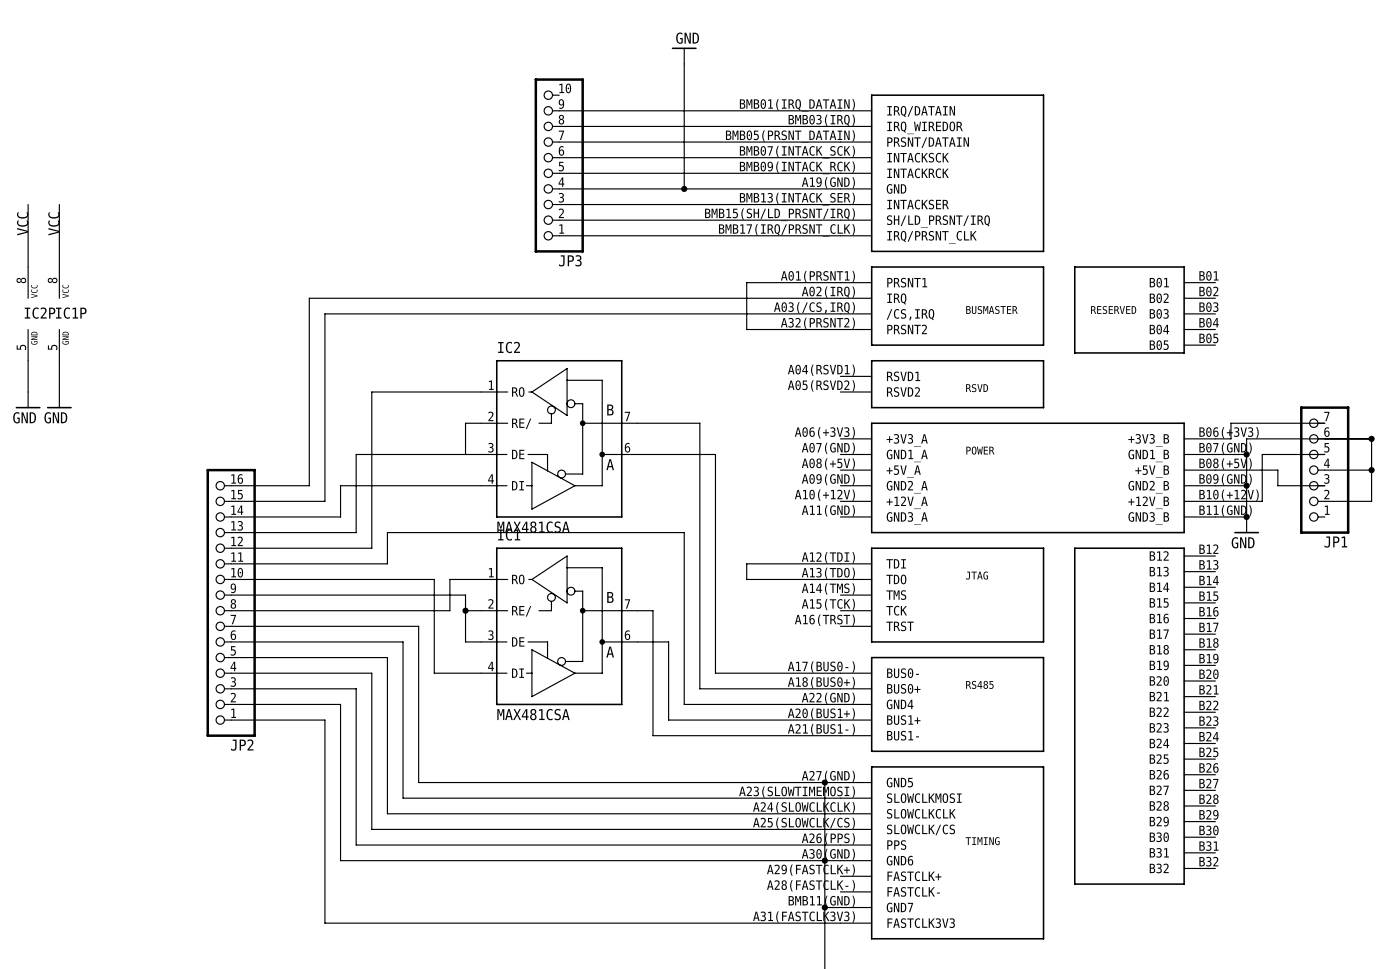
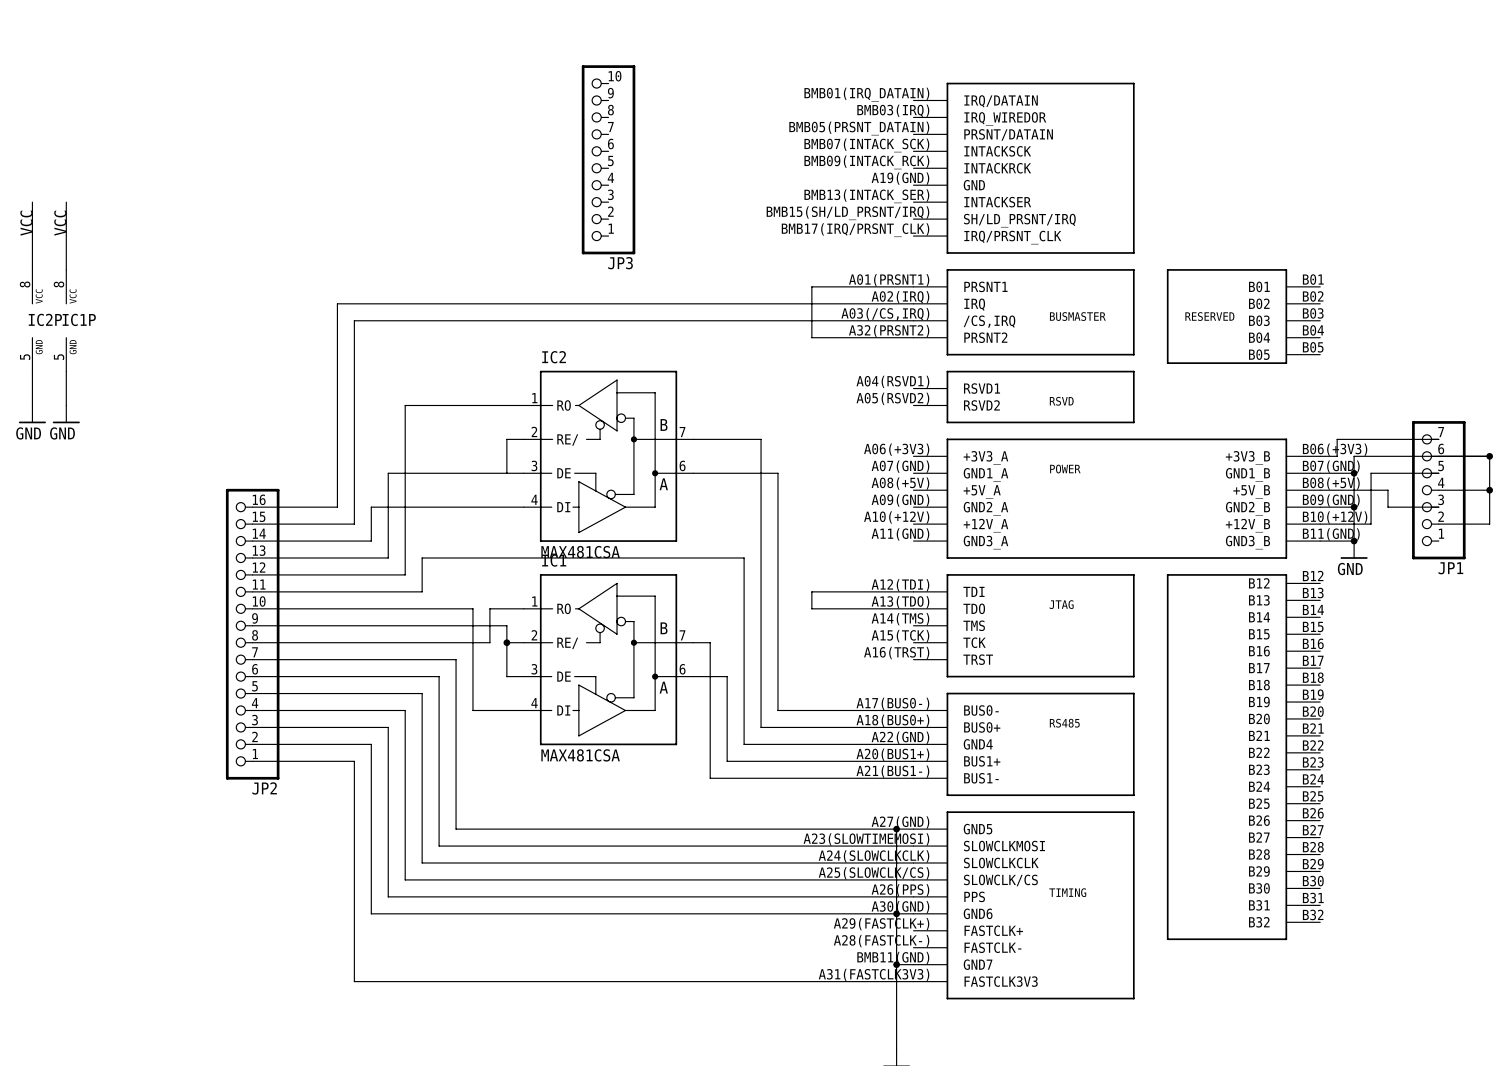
power symbol: GND (684, 55) -> none
wire: (684, 63) (684, 188) -> none
wire: (559, 110) (840, 110) -> none
wire: (559, 126) (840, 126) -> none
wire: (559, 142) (840, 142) -> none
wire: (559, 157) (840, 157) -> none
wire: (559, 173) (840, 173) -> none
wire: (559, 188) (840, 188) -> none
junction: (684, 188) -> none
wire: (559, 204) (840, 204) -> none
wire: (559, 220) (840, 220) -> none
wire: (559, 235) (840, 235) -> none

